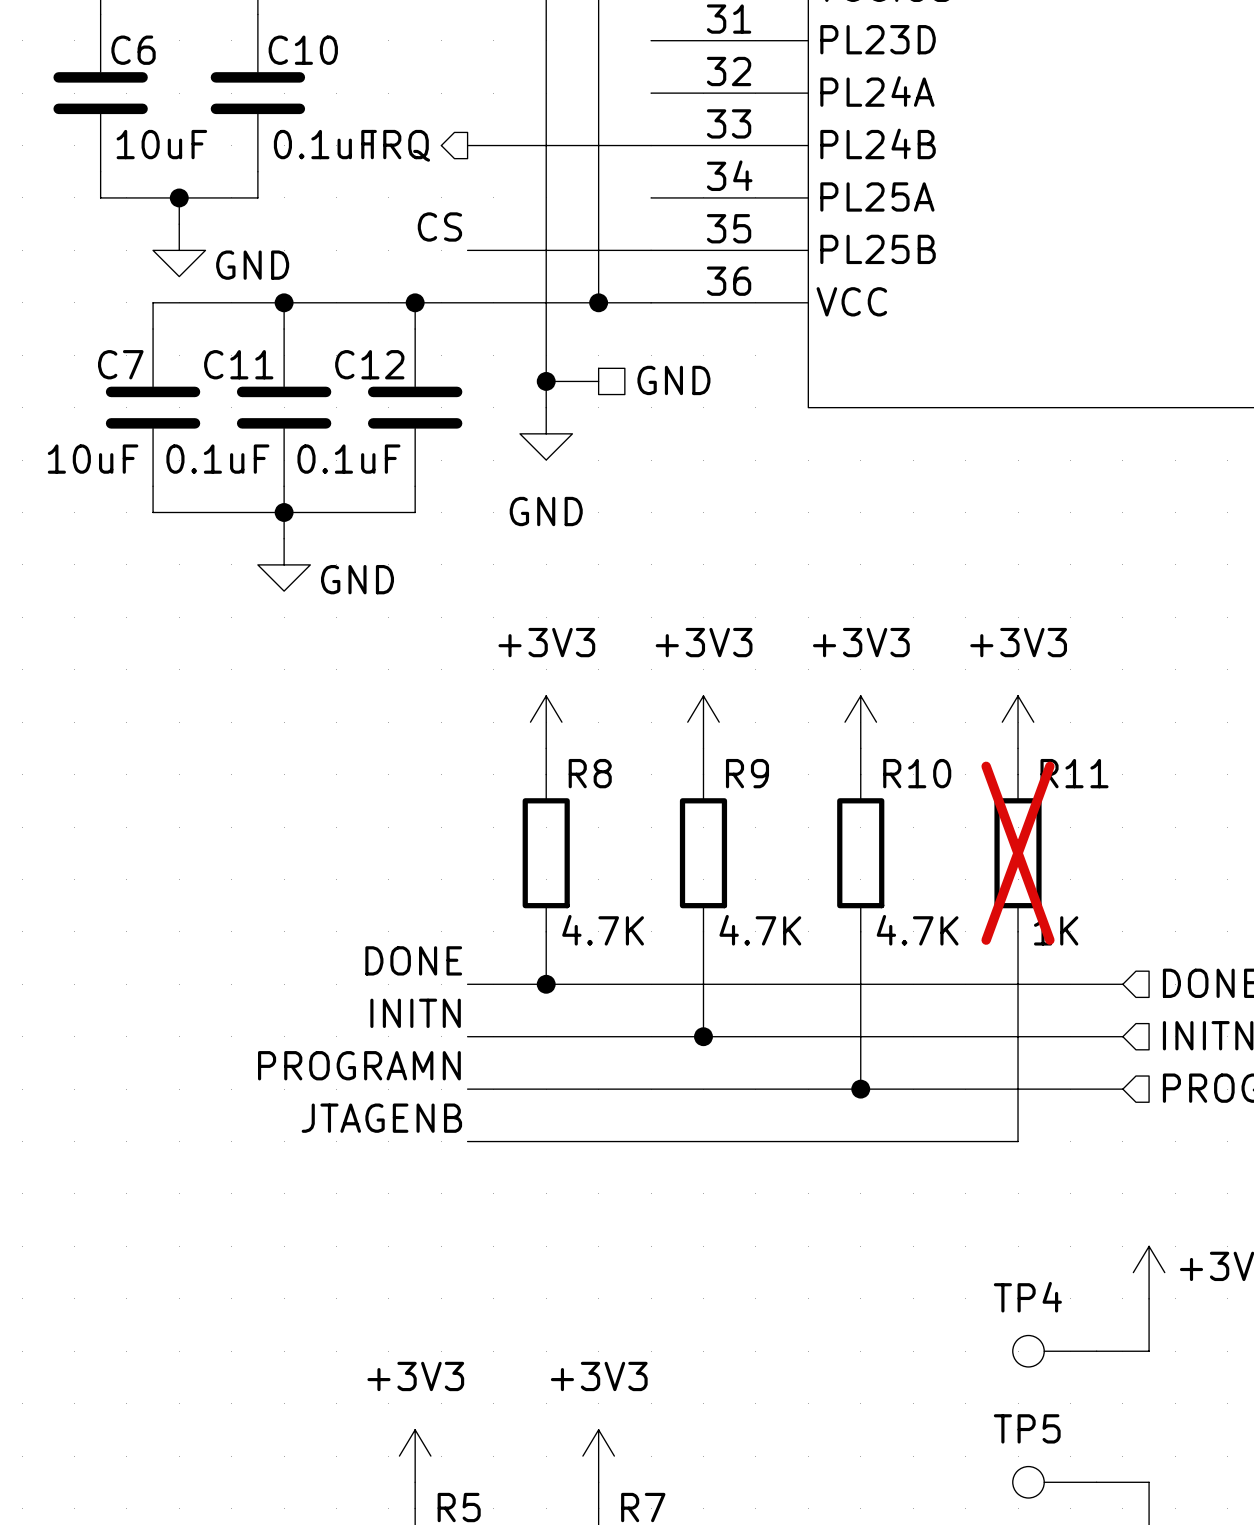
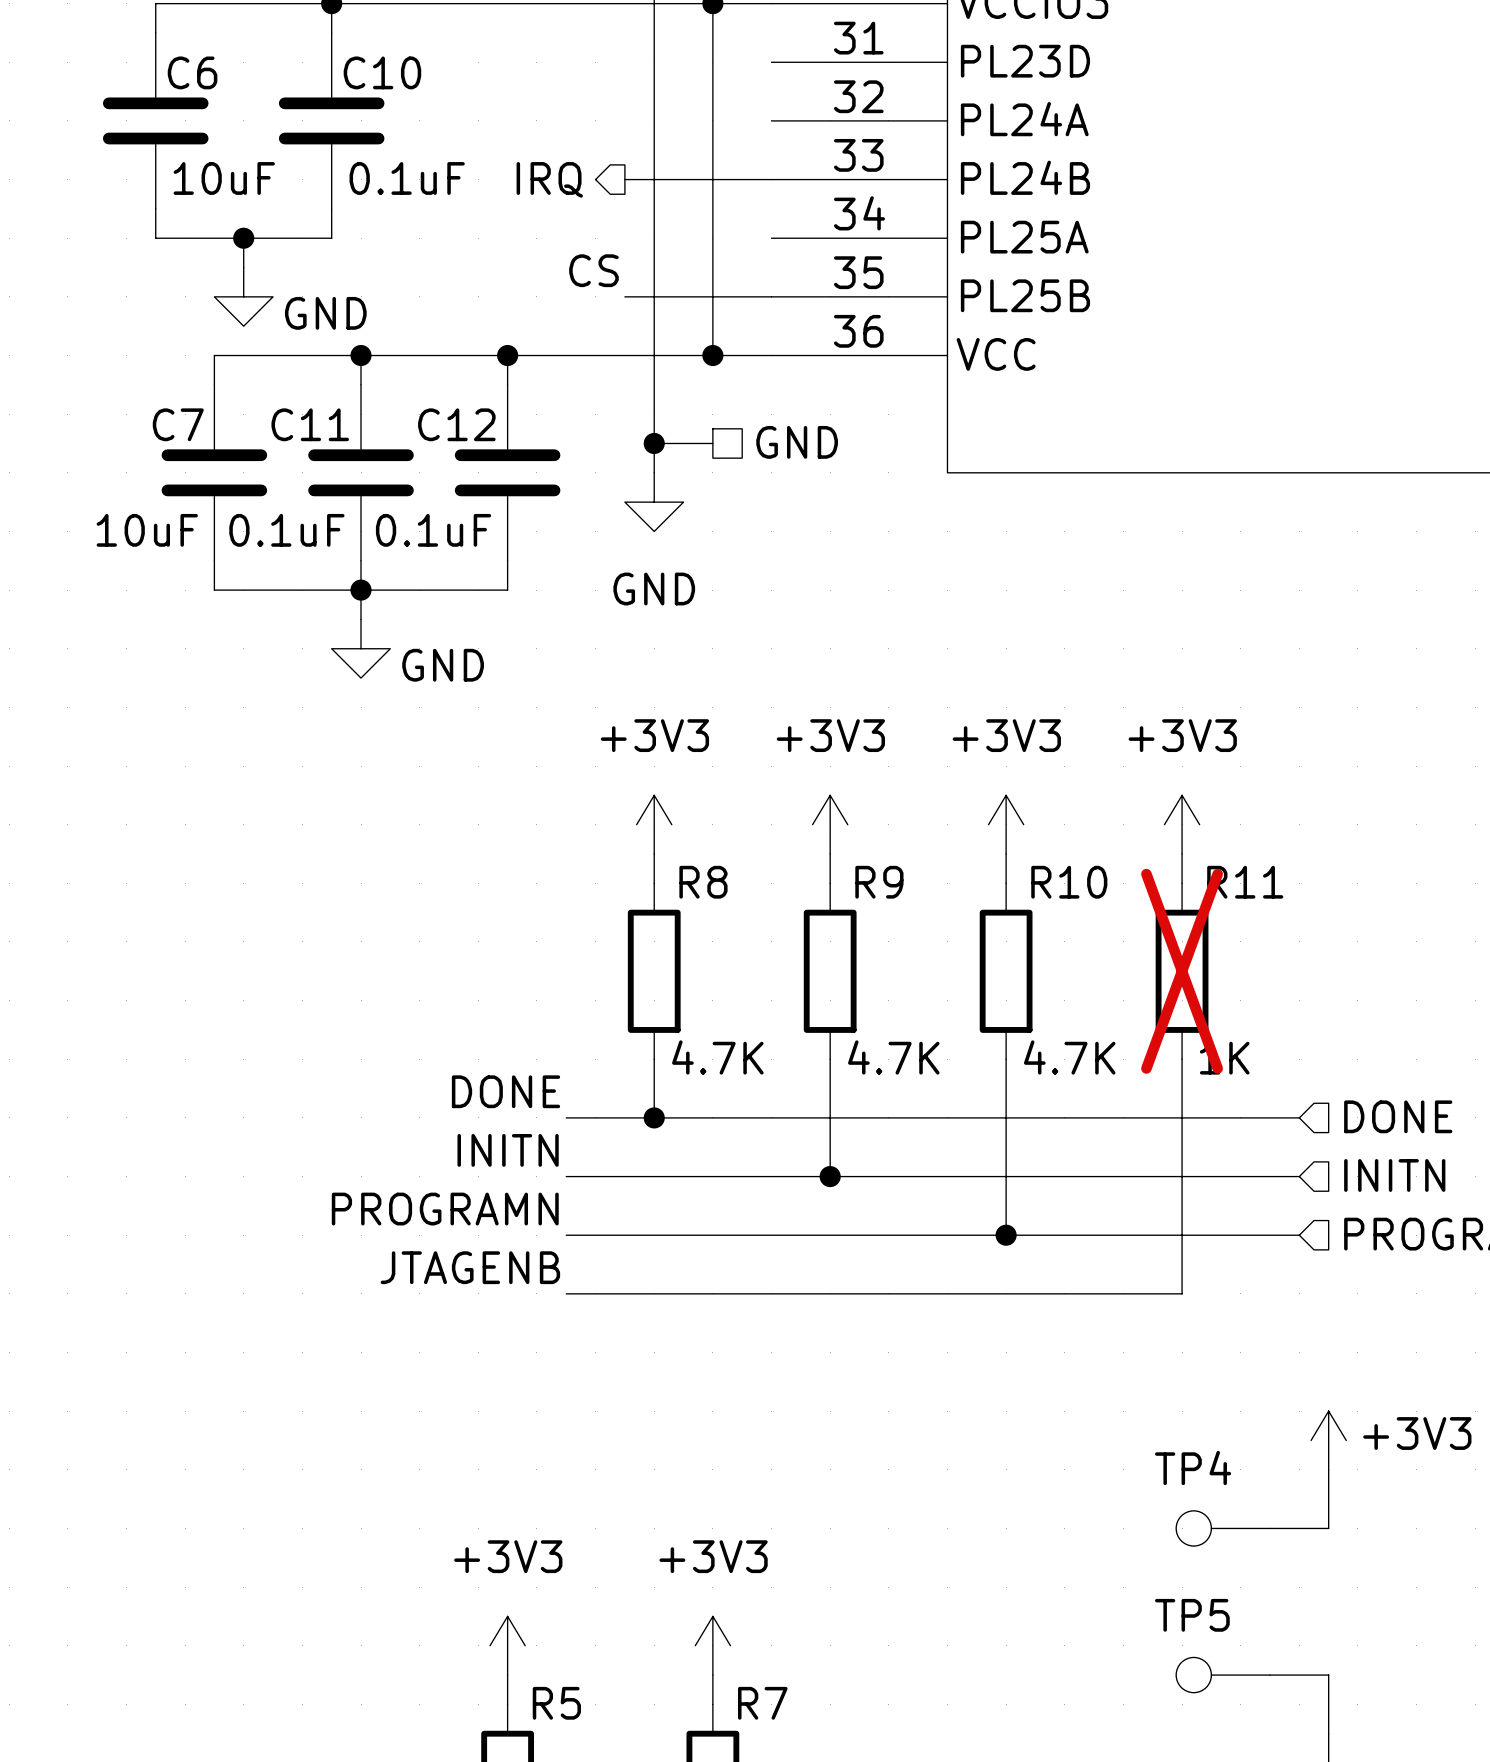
hierarchical label position: IRQ (400, 145) -> IRQ (549, 179)
wire: (467, 145) (520, 145) -> none
label position: CS (439, 226) -> CS (593, 270)
wire: (467, 250) (520, 250) -> none

